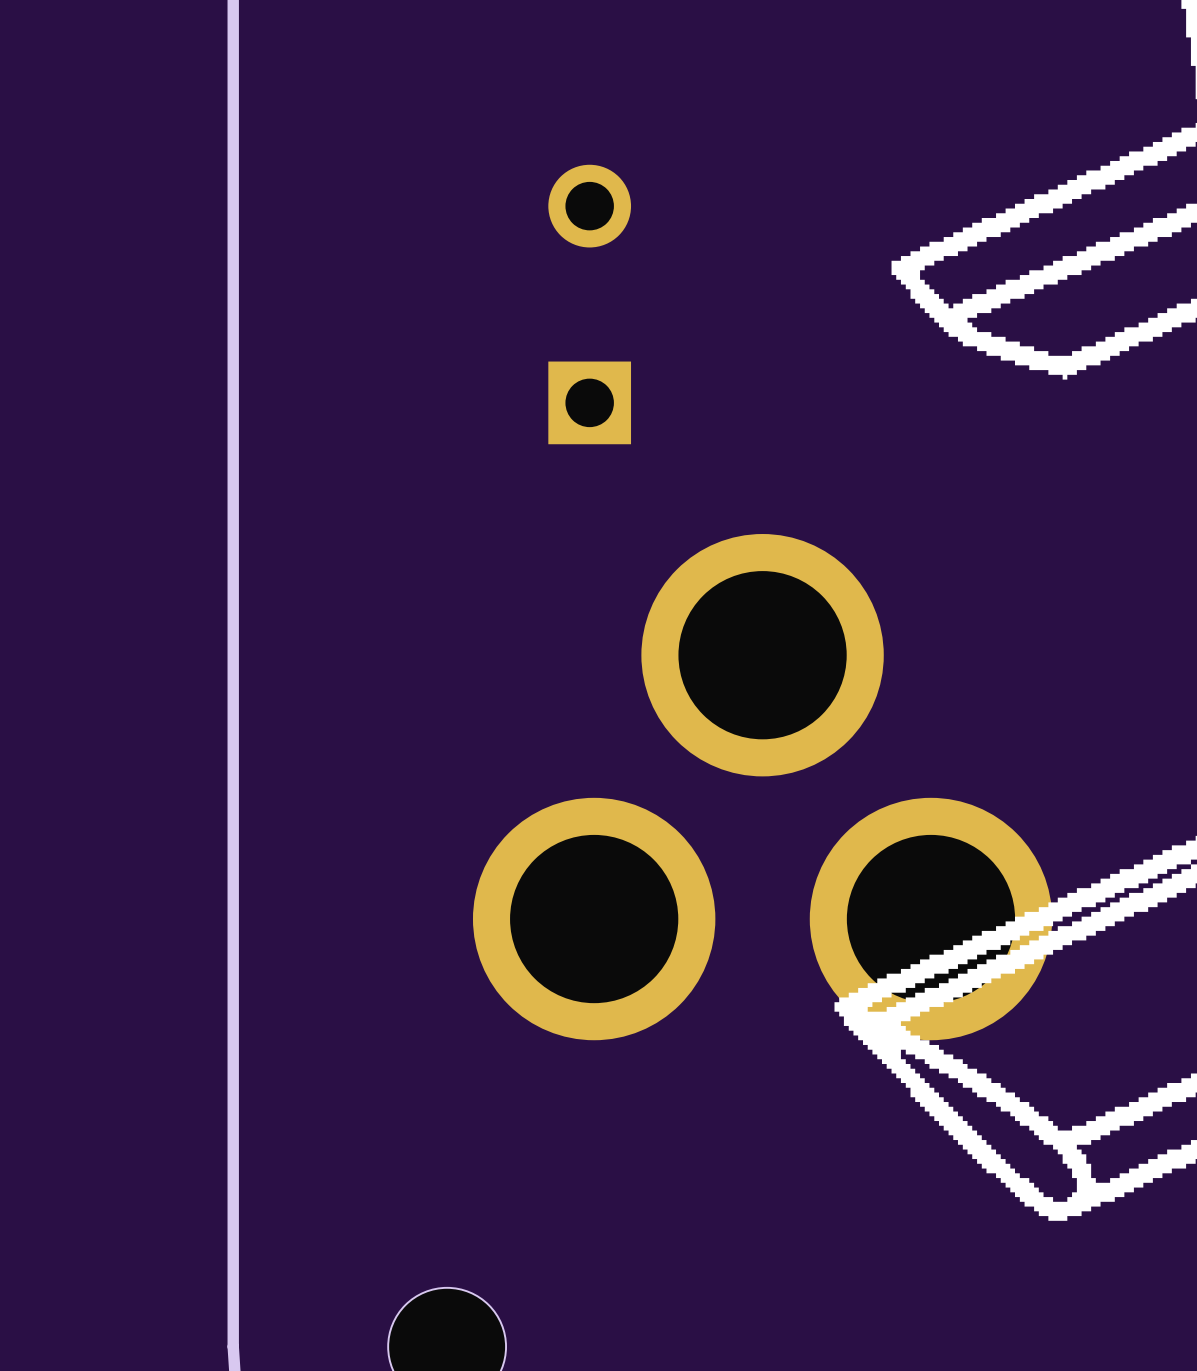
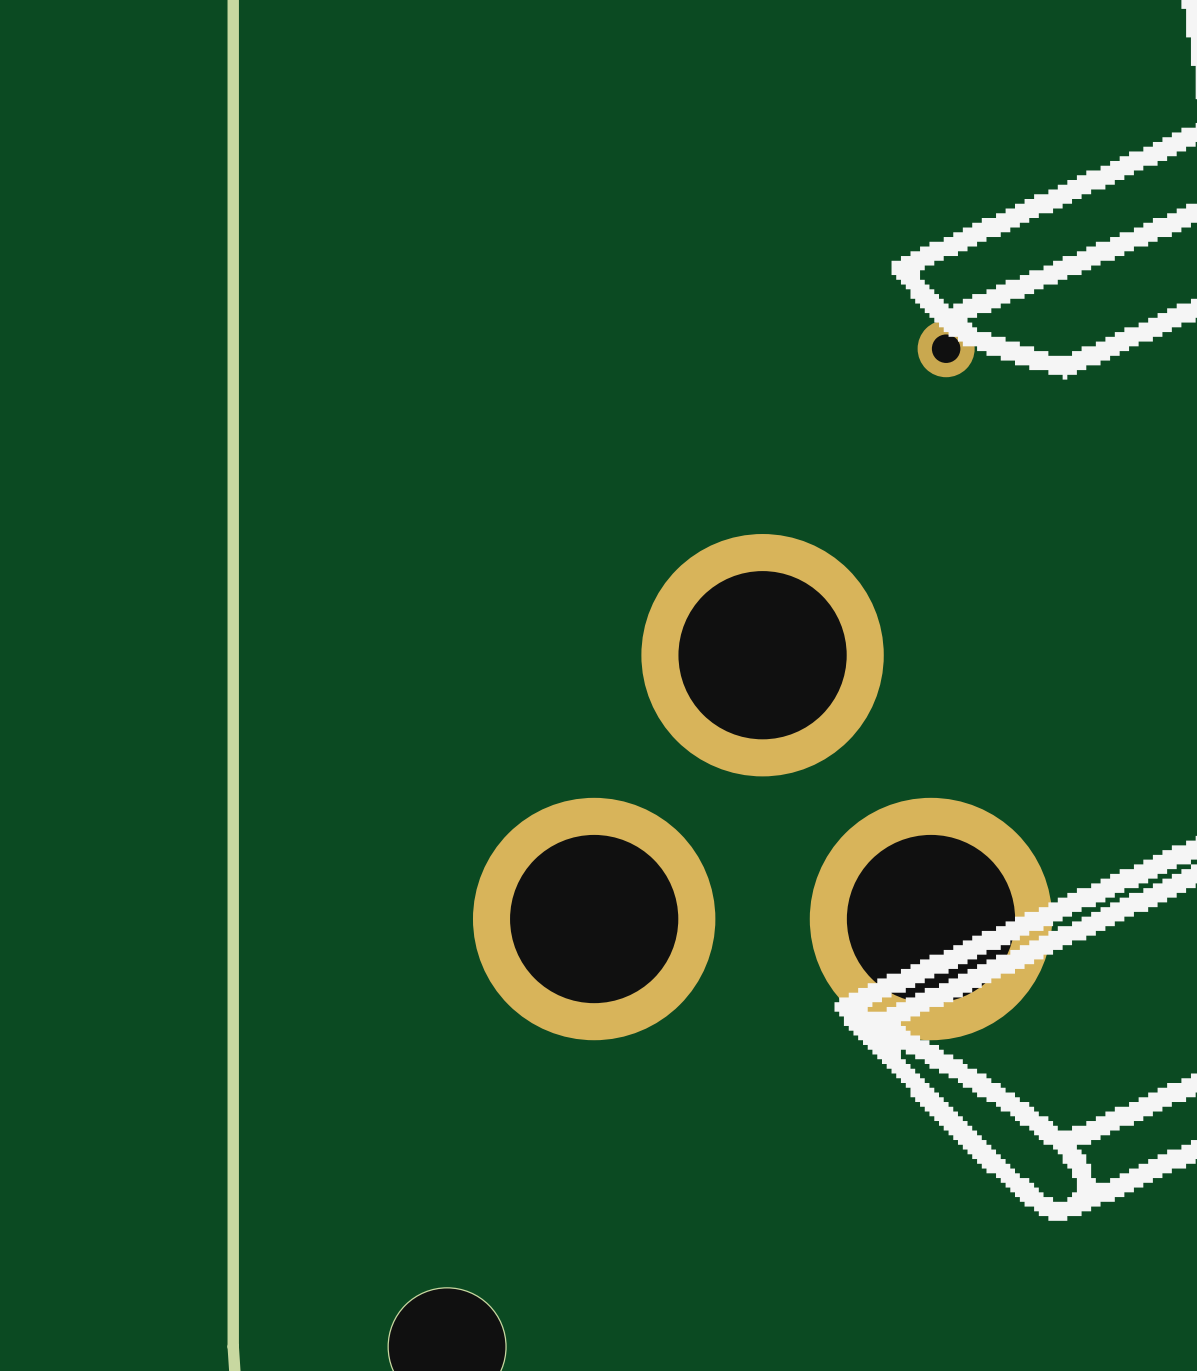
part: (589, 304) -> none
via: none -> (946, 348)

